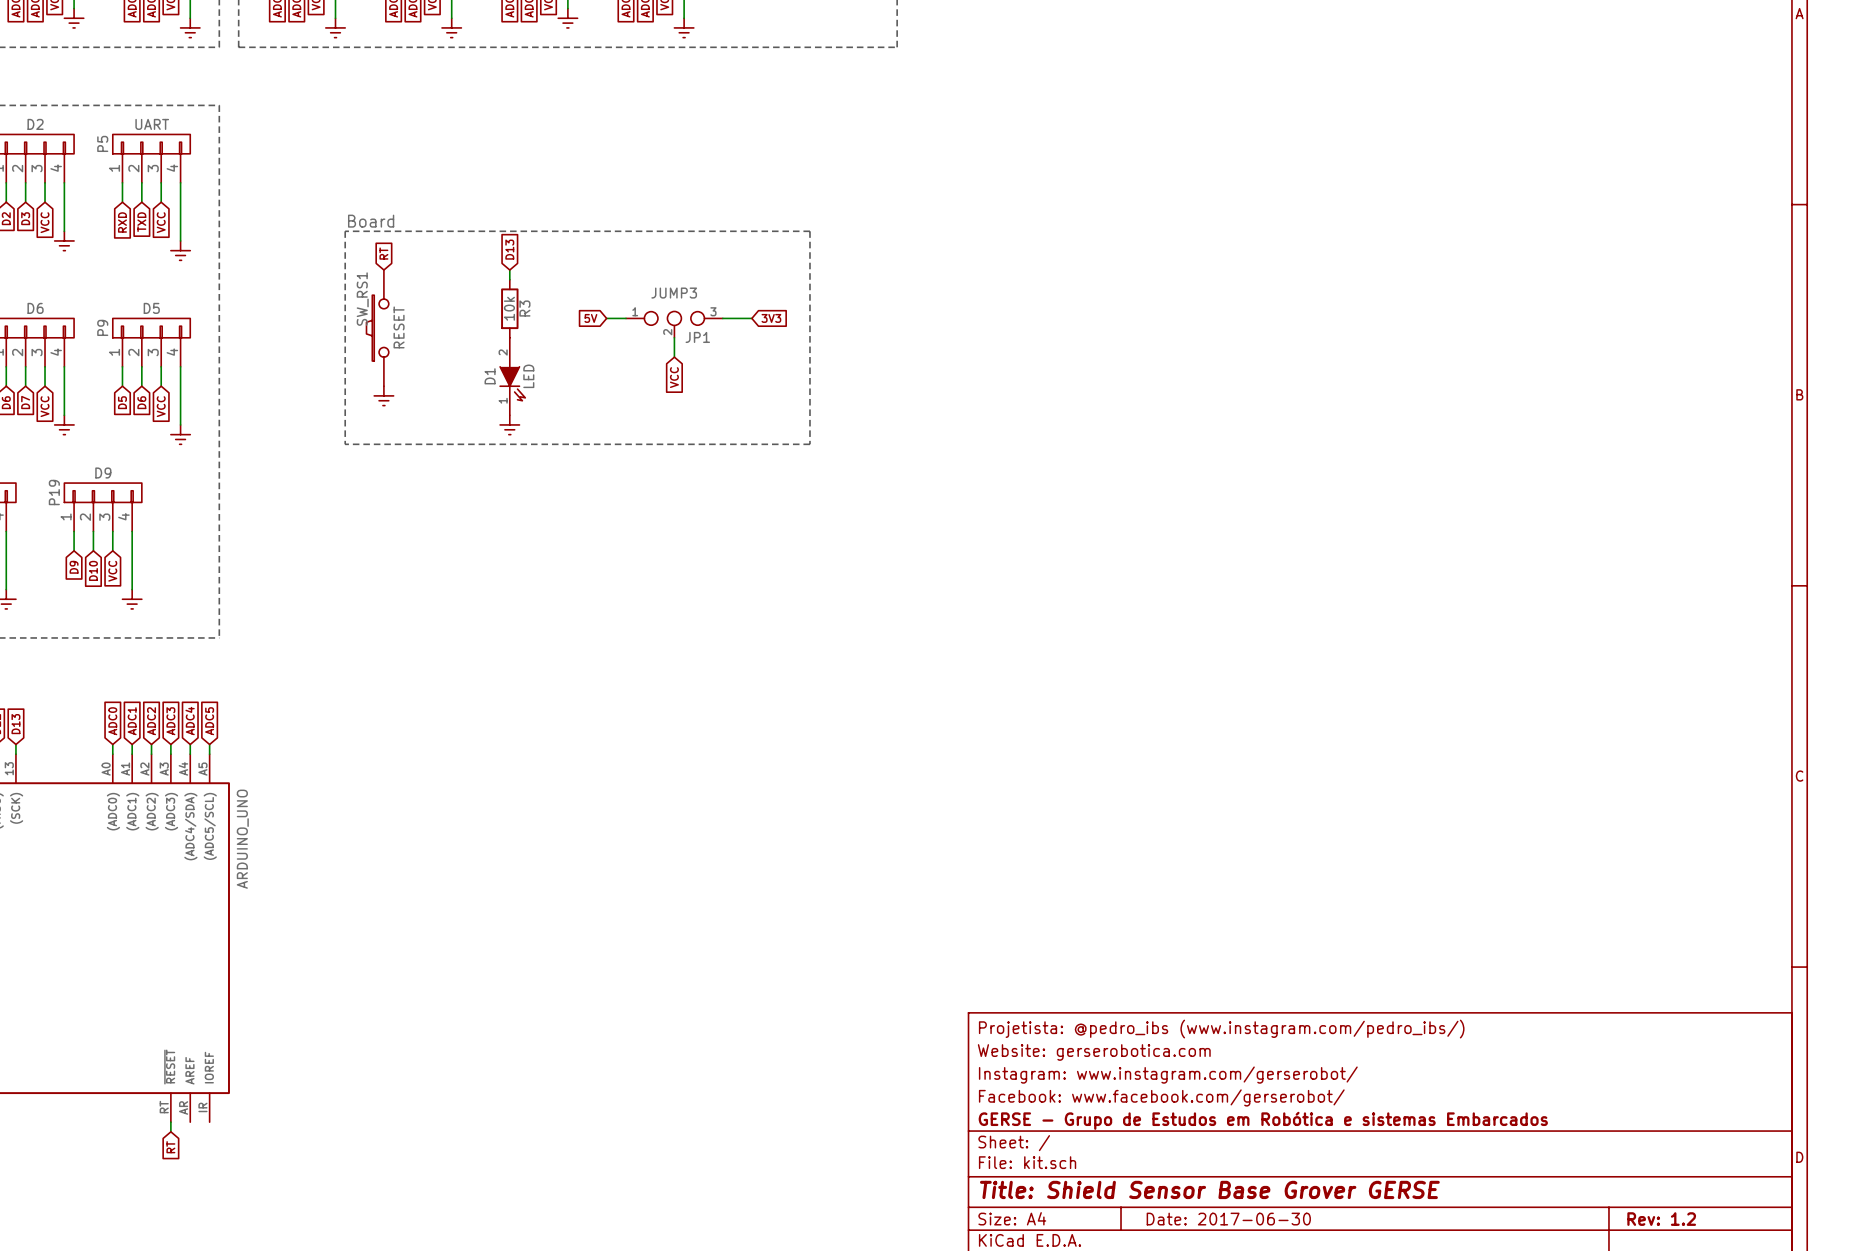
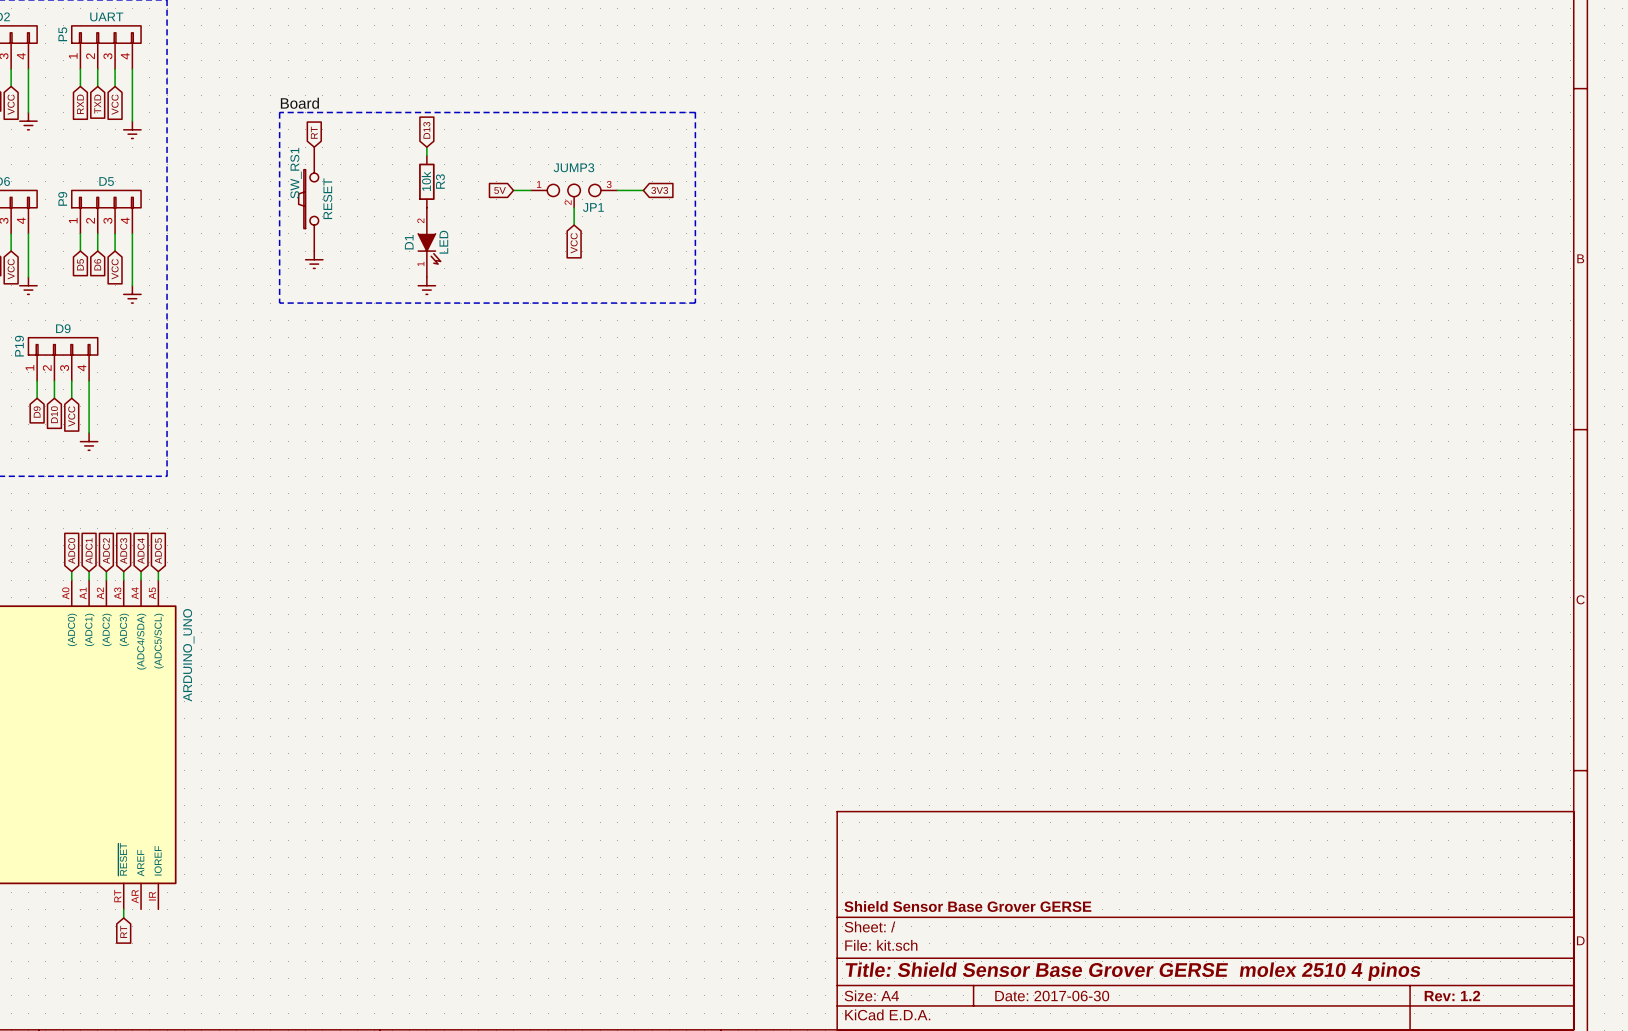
title block: Projetista: @pedro_ibs (www.instagram.com/pedro_ibs/) (1221, 1029) -> none
title block: Website: gerserobotica.com (1094, 1052) -> none
title block: Instagram: www.instagram.com/gerserobot/ (1168, 1075) -> none
title block: Facebook: www.facebook.com/gerserobot/ (1161, 1097) -> none
title block: GERSE - Grupo de Estudos em Robótica e sistemas Embarcados (1263, 1120) -> Shield Sensor Base Grover GERSE (967, 906)
title block: Title: Shield Sensor Base Grover GERSE (1209, 1189) -> Title: Shield Sensor Base Grover GERSE molex 2510 4 pinos (1132, 971)

